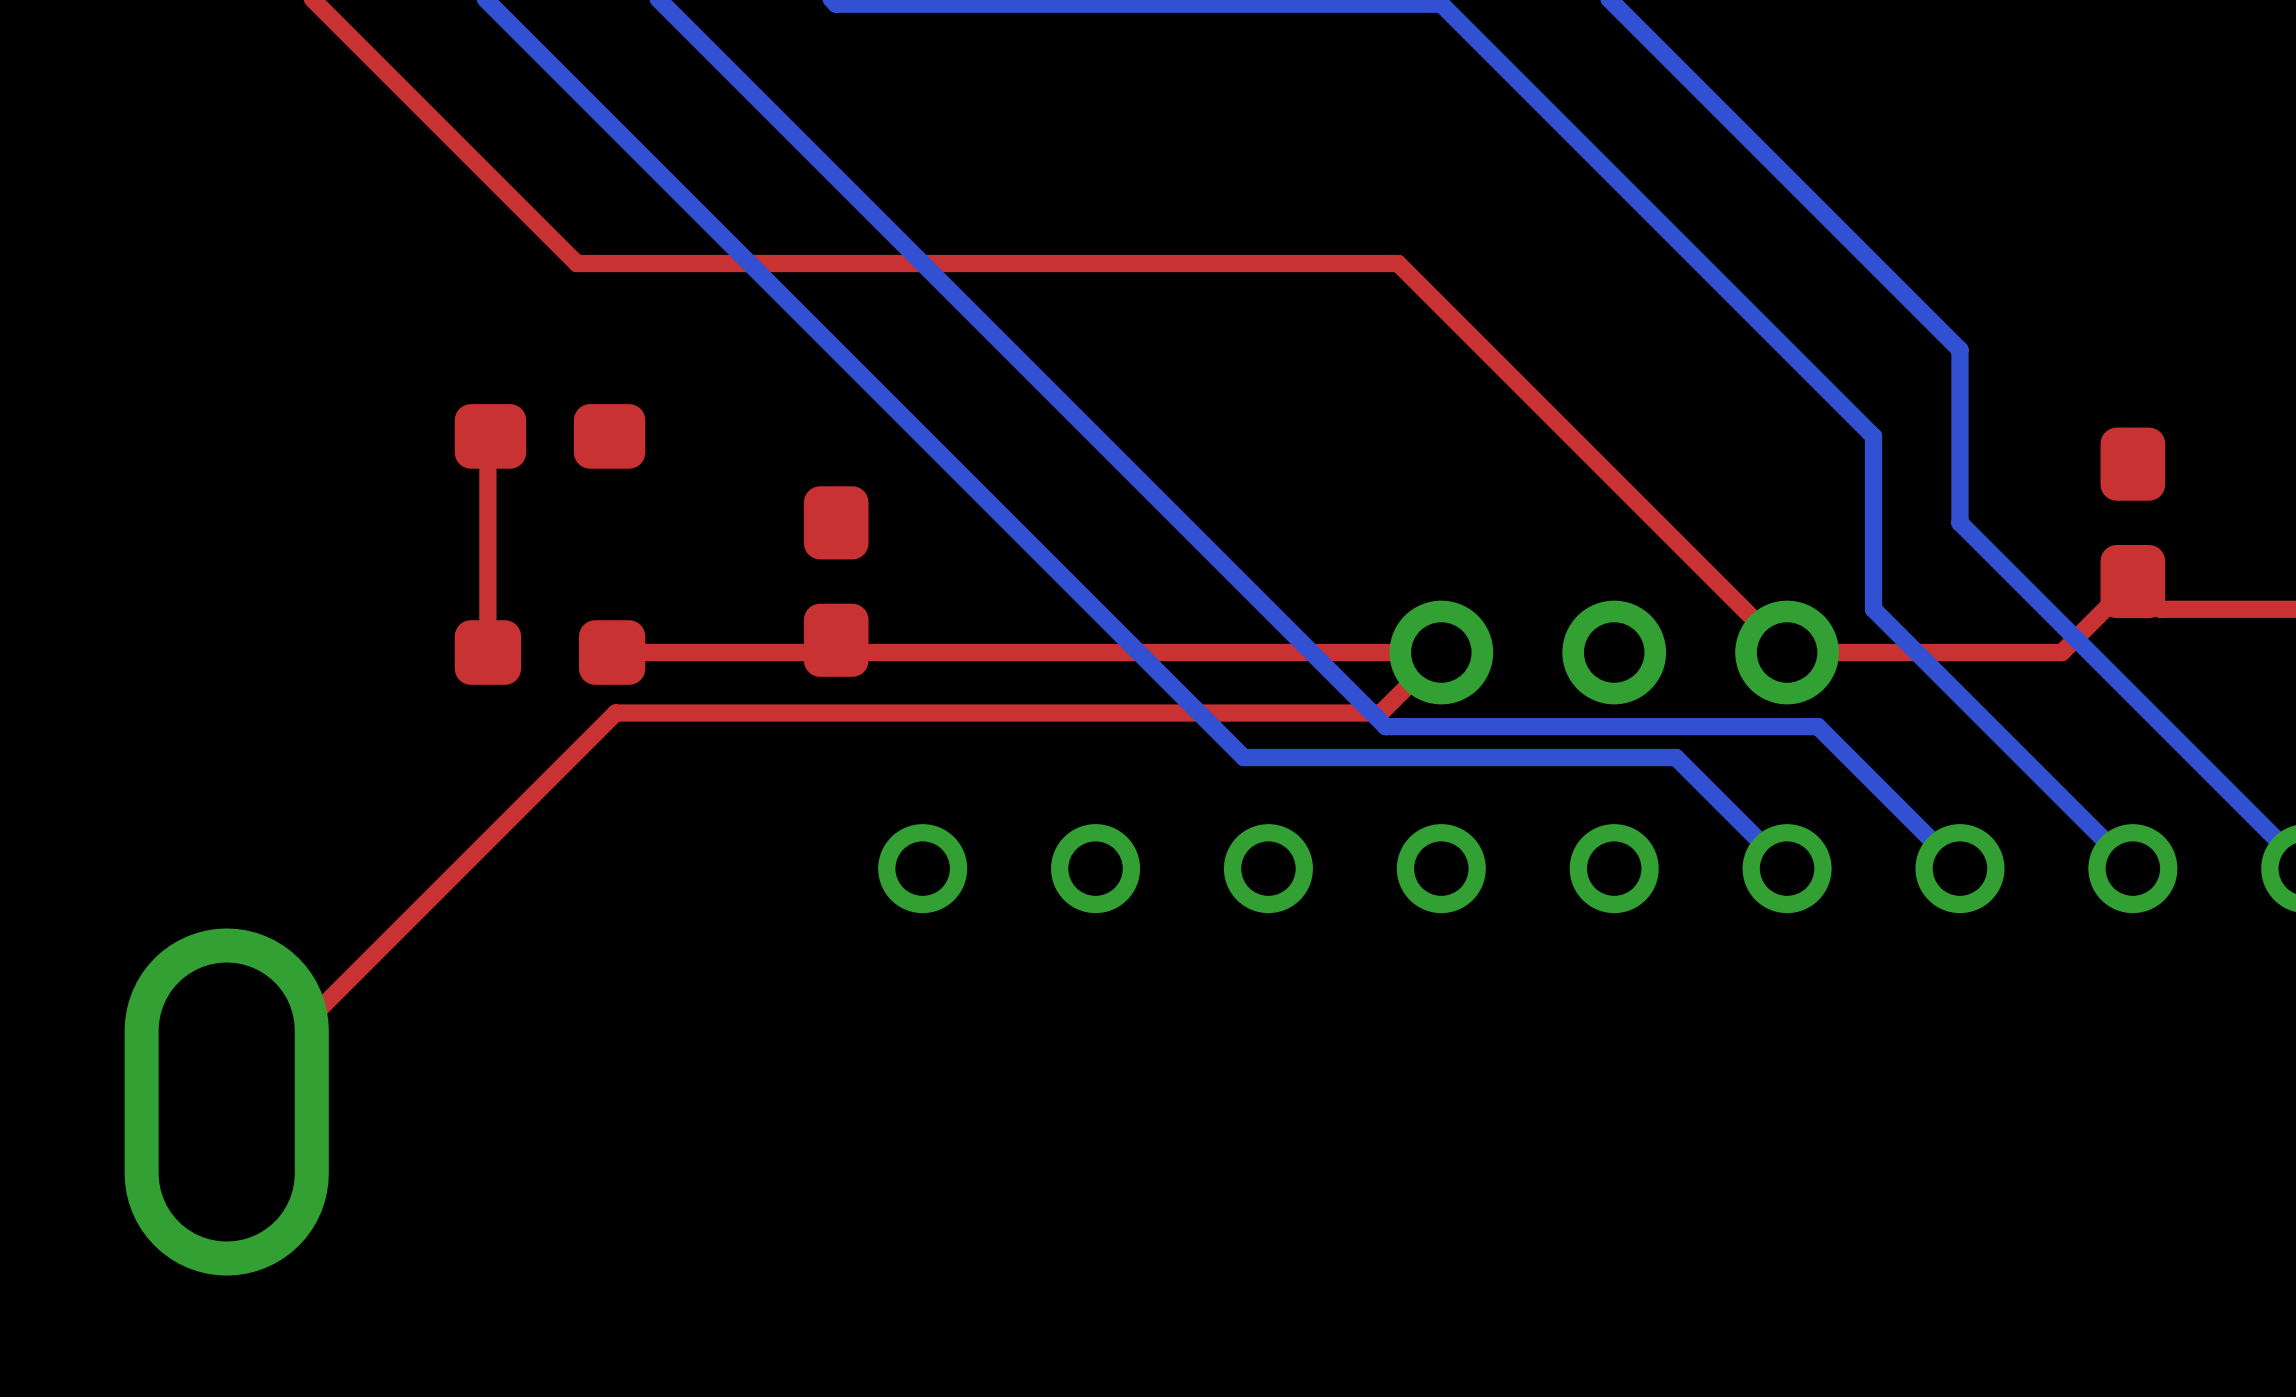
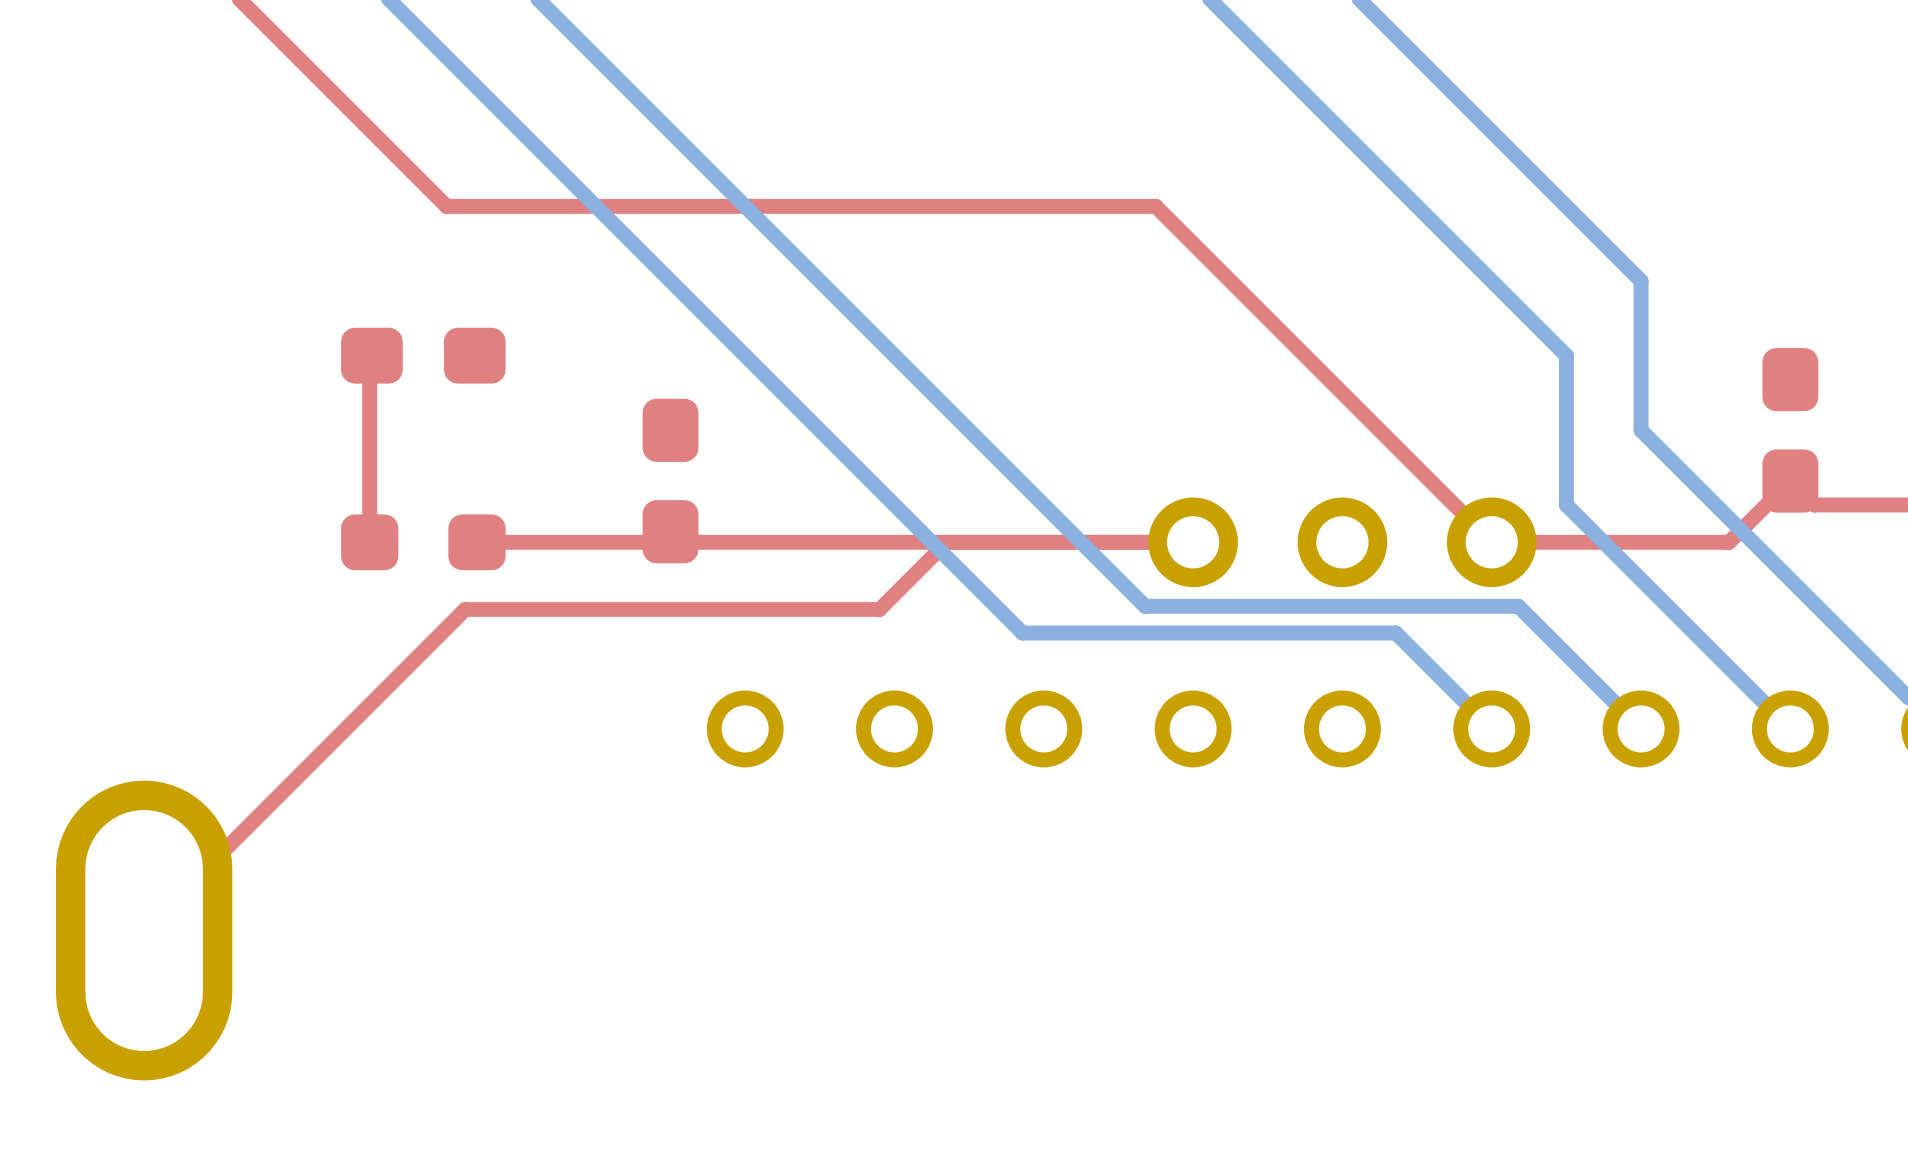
top track: (1441, 652) (1380, 713) (615, 713) (598, 730) -> (1193, 542) (946, 542) (879, 609) (465, 609)

